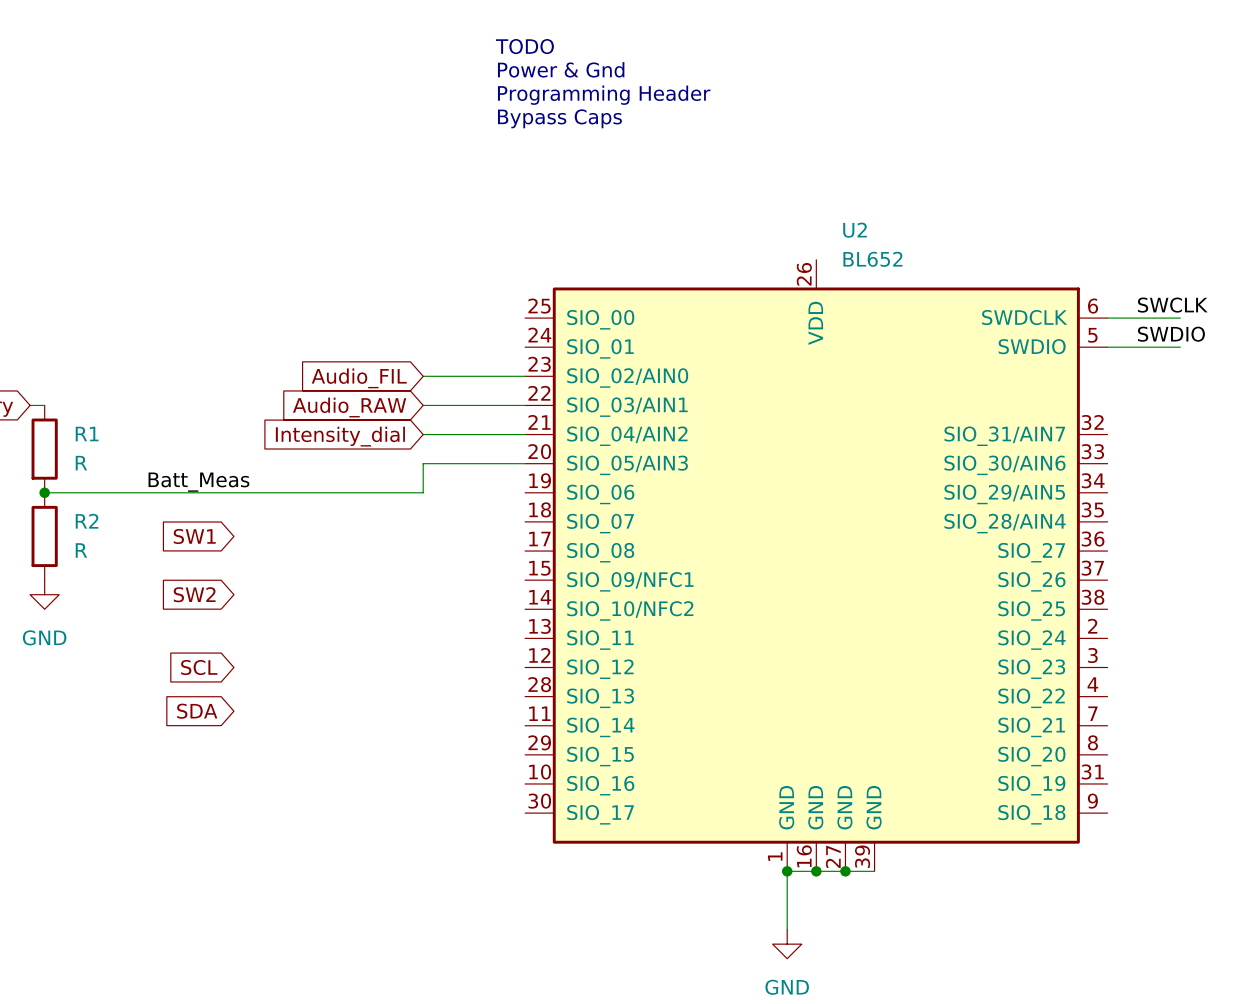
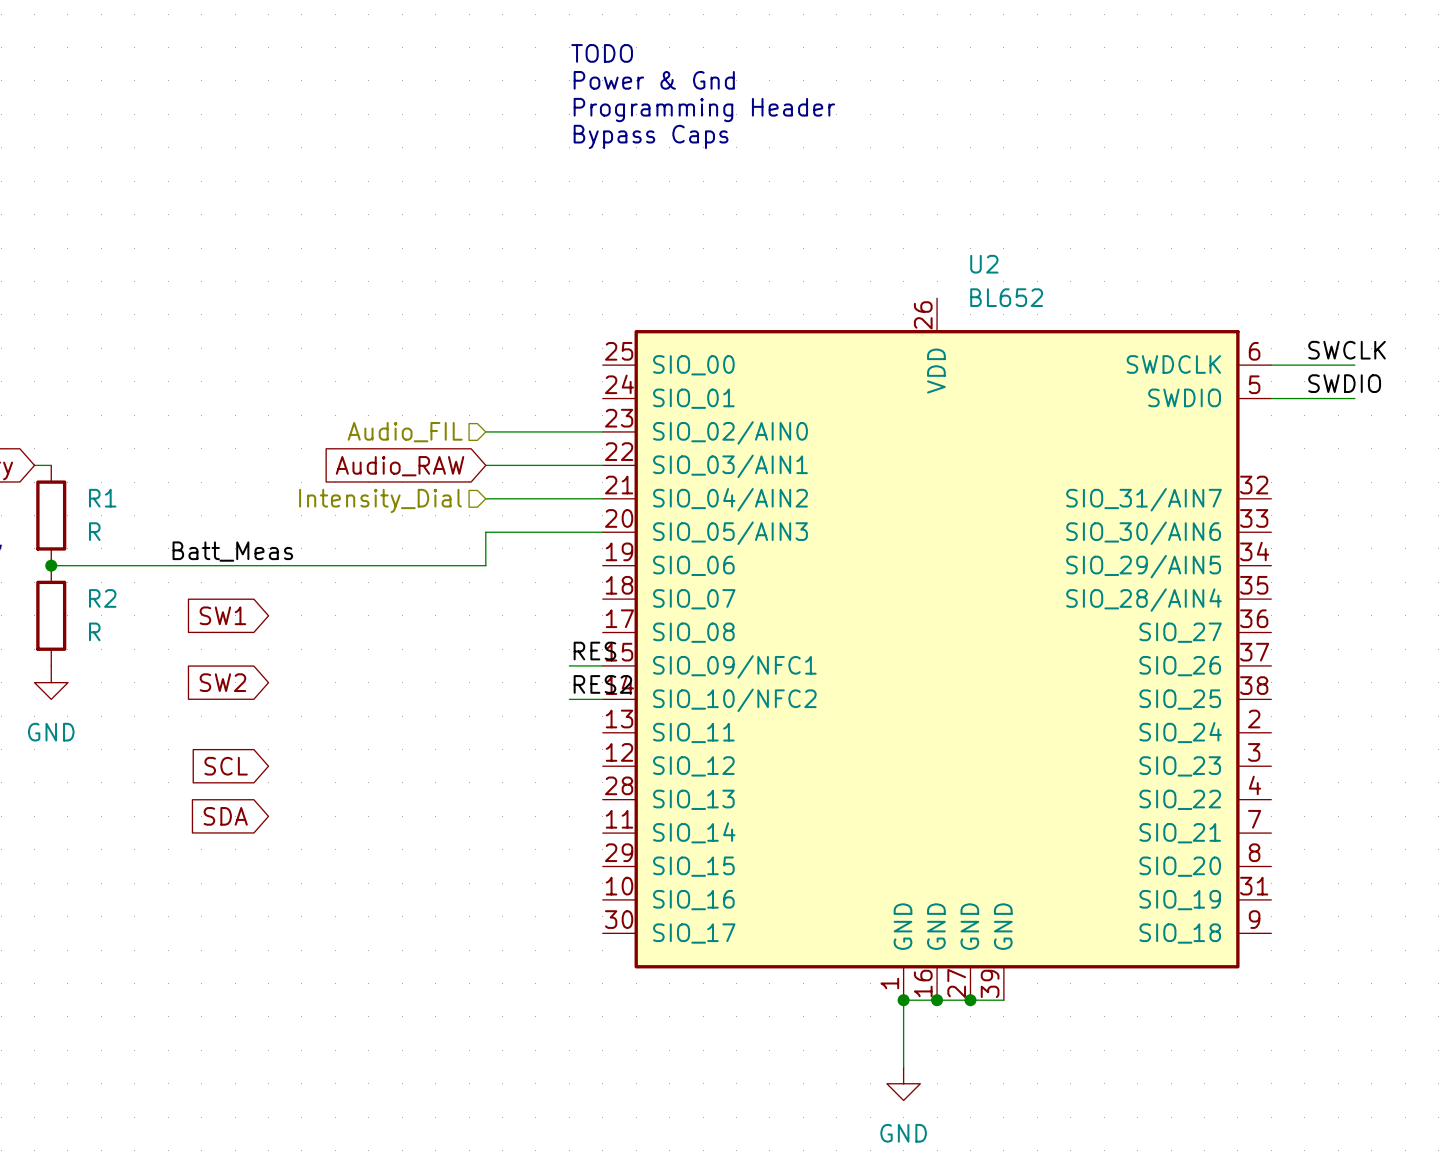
hierarchical label: none -> Audio_FIL (405, 432)
global label: Audio_FIL (359, 378) -> none
hierarchical label: none -> Intensity_Dial (380, 500)
global label: Intensity_dial (340, 436) -> none
label: none -> RES (594, 651)
wire: none -> (569, 665) (602, 665)
label: none -> RES2 (602, 684)
wire: none -> (569, 699) (602, 699)

